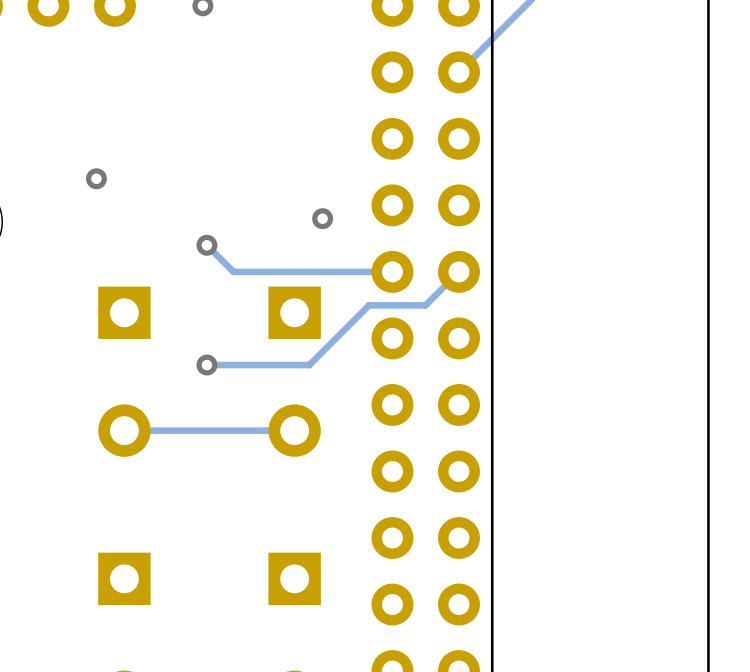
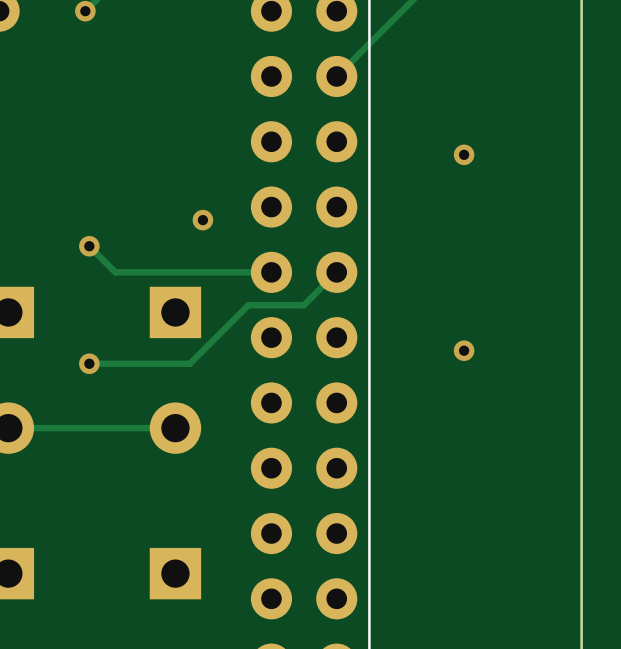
via: none -> (464, 154)
via: none -> (464, 350)

